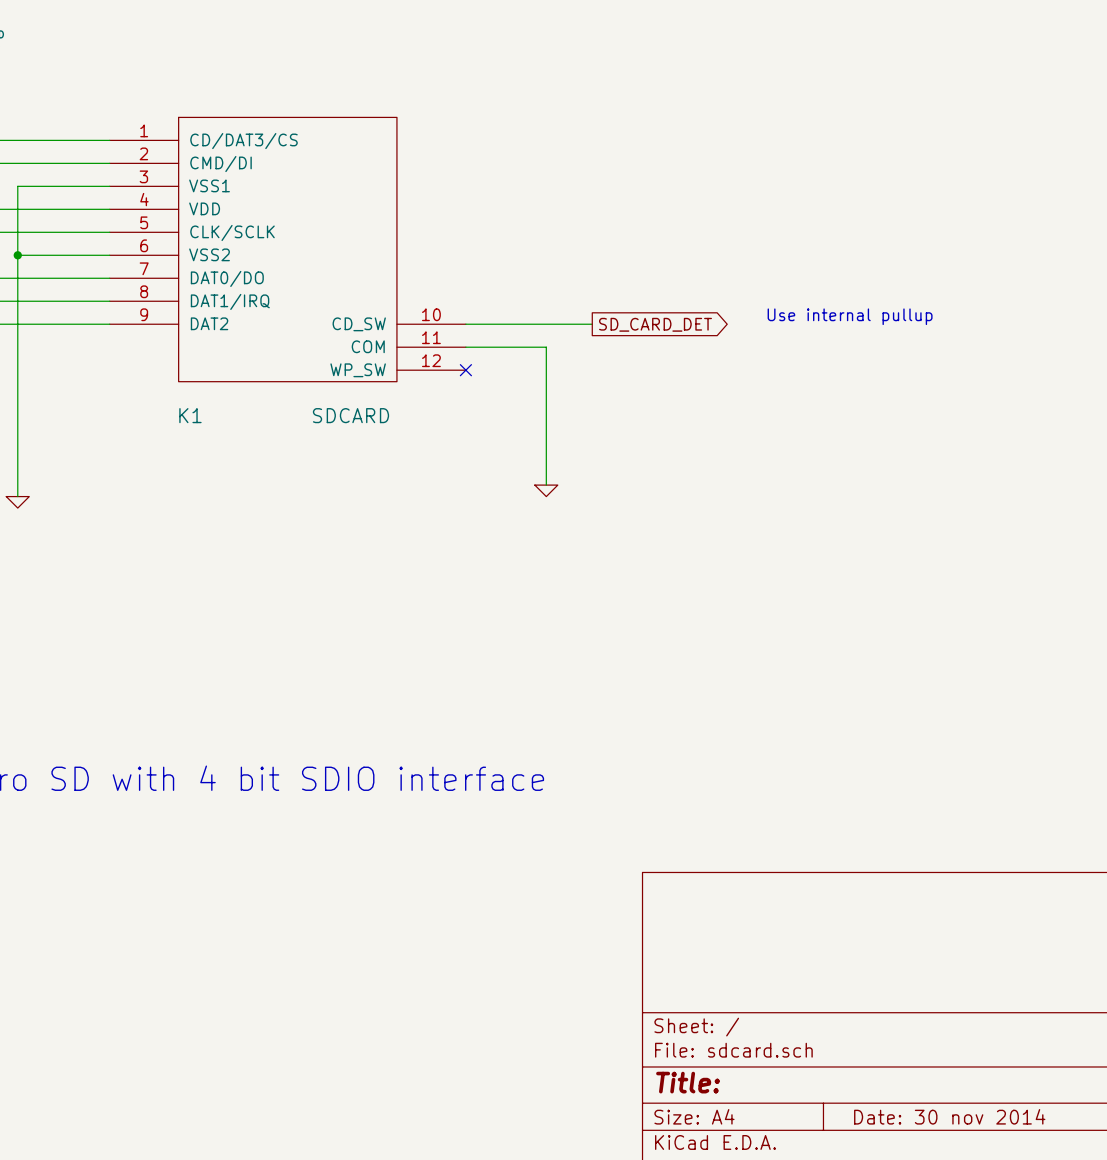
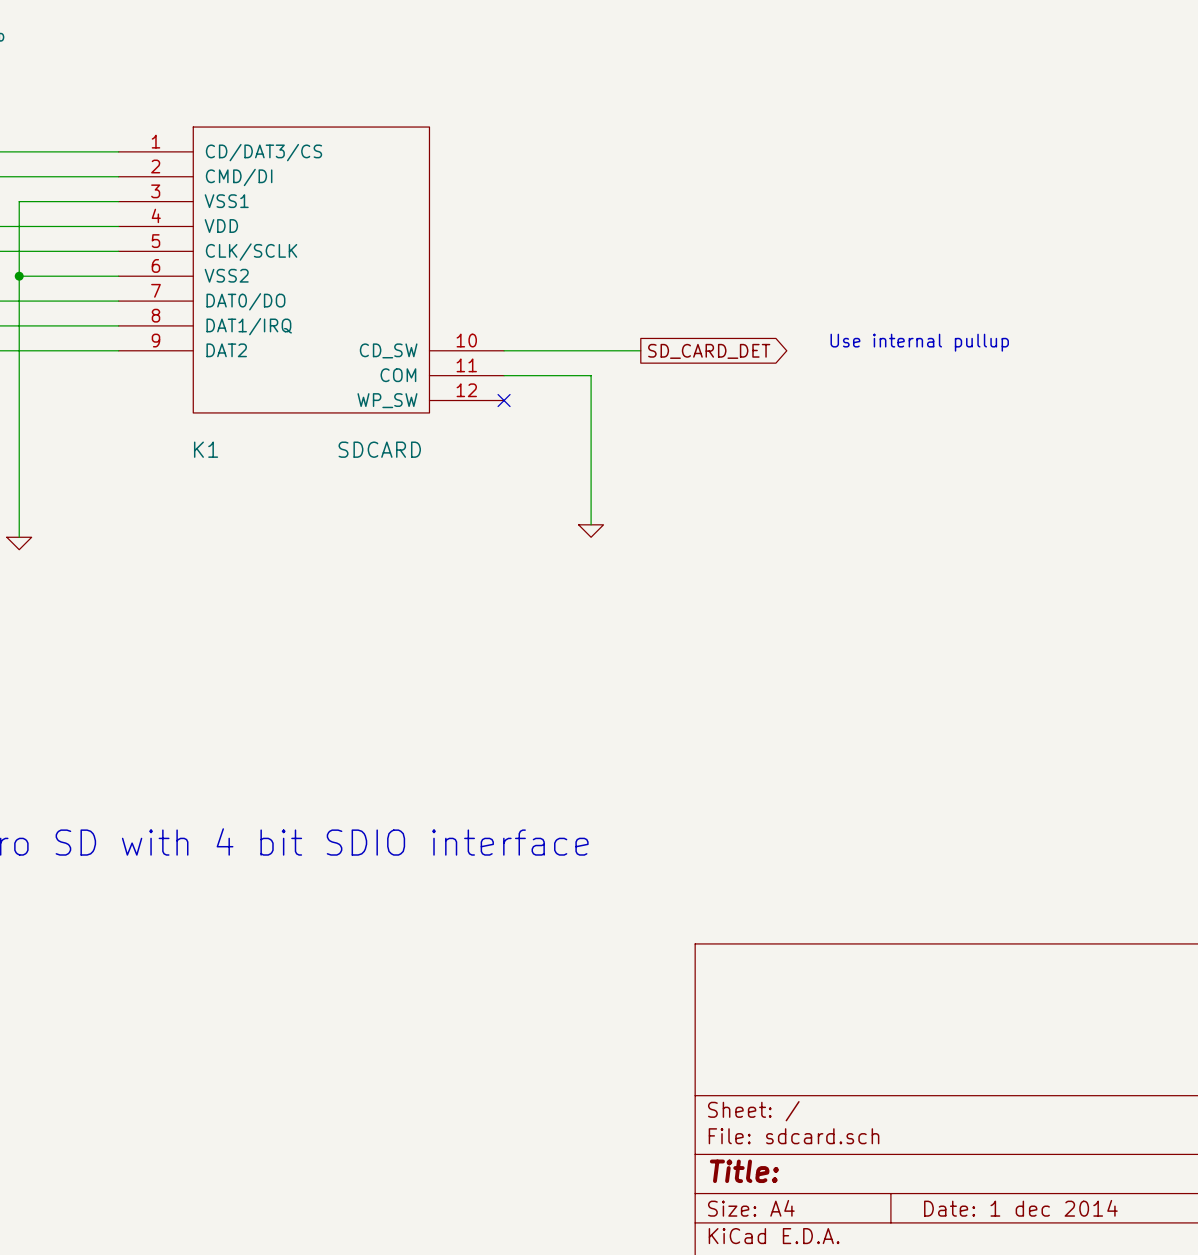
title block: Date: 30 nov 2014 (949, 1116) -> Date: 1 dec 2014 (1020, 1208)

